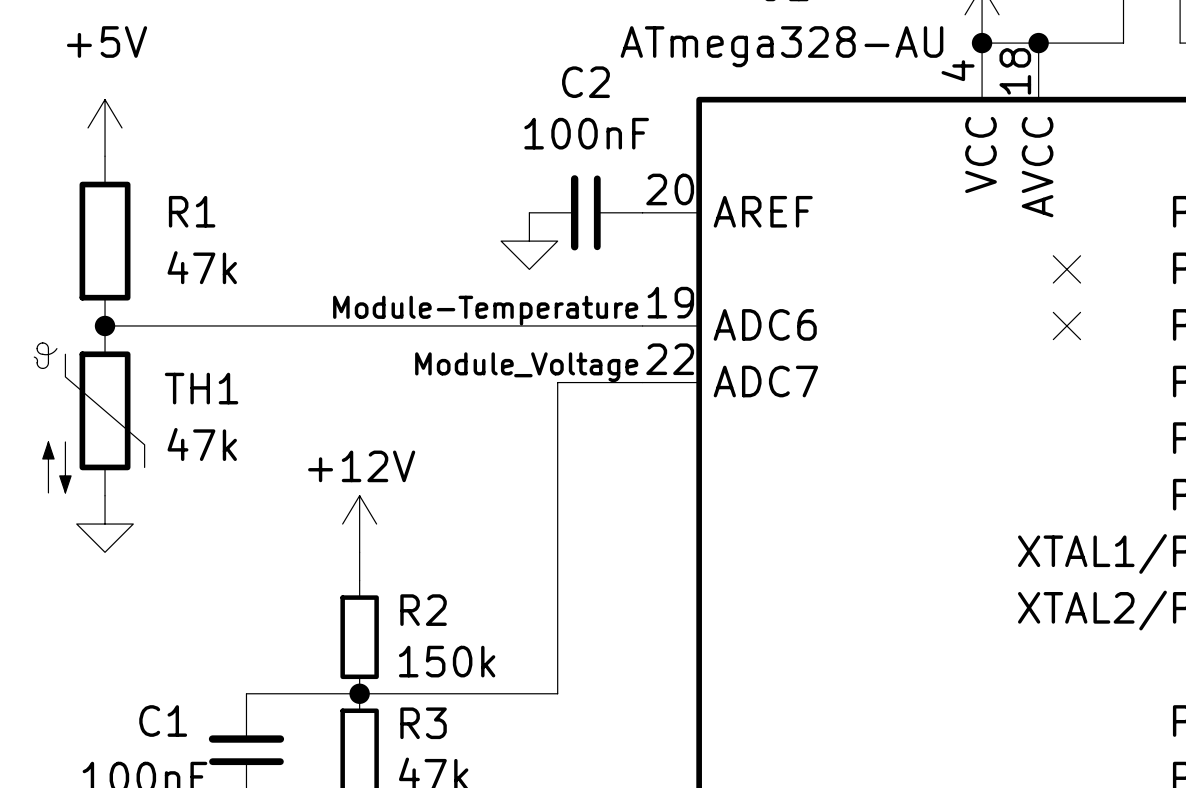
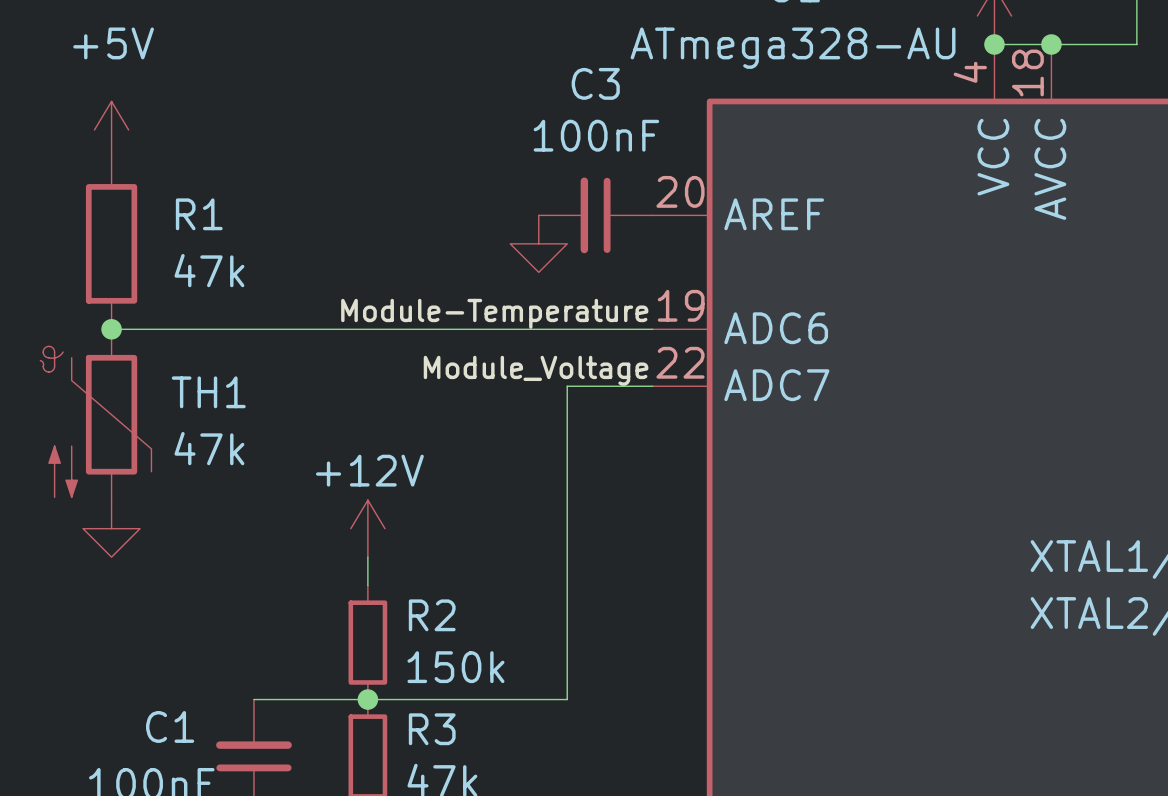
C2 name: C2 (585, 82) -> C3 (595, 83)
no-connect mark: (1066, 269) -> none
no-connect mark: (1066, 325) -> none

